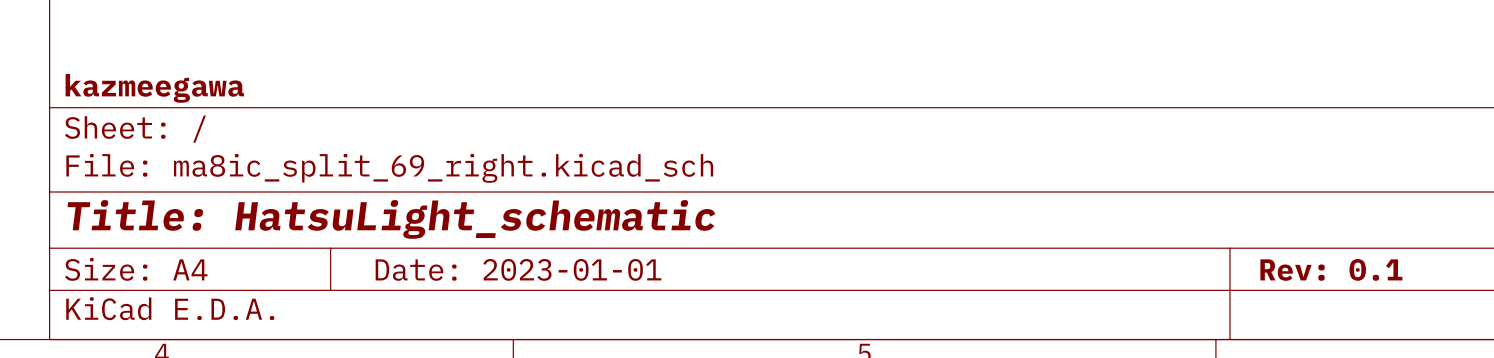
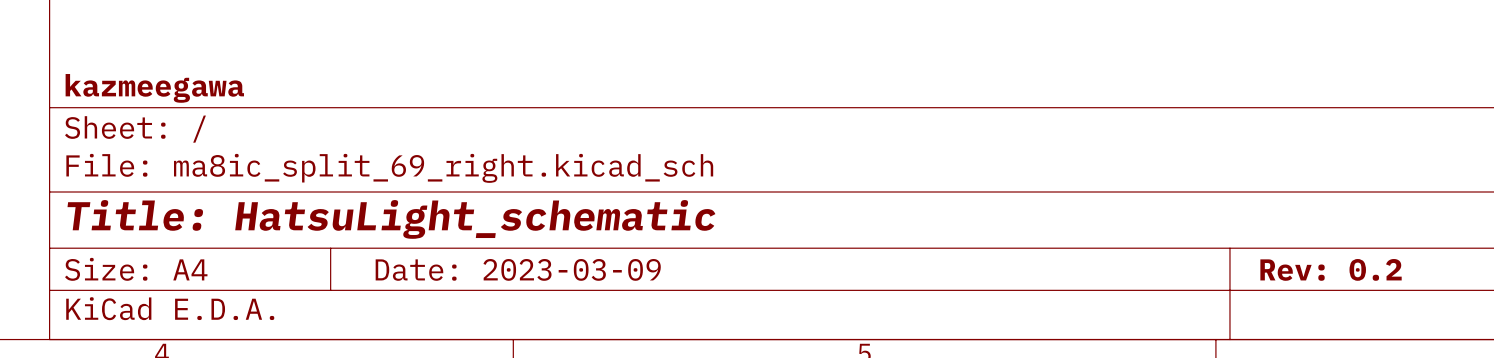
title block: Date: 2023-01-01 (518, 269) -> Date: 2023-03-09 (518, 269)
title block: Rev: 0.1 (1331, 269) -> Rev: 0.2 (1331, 269)

